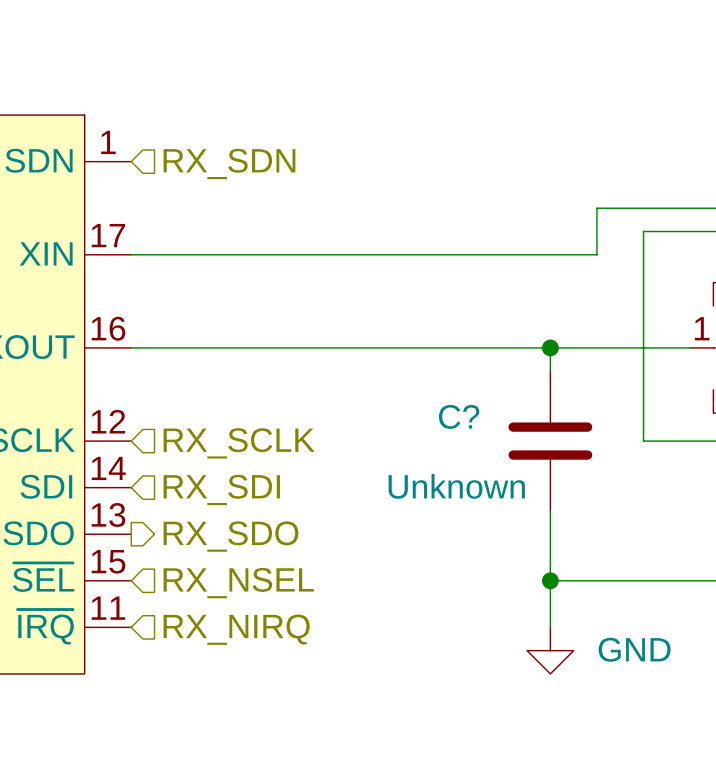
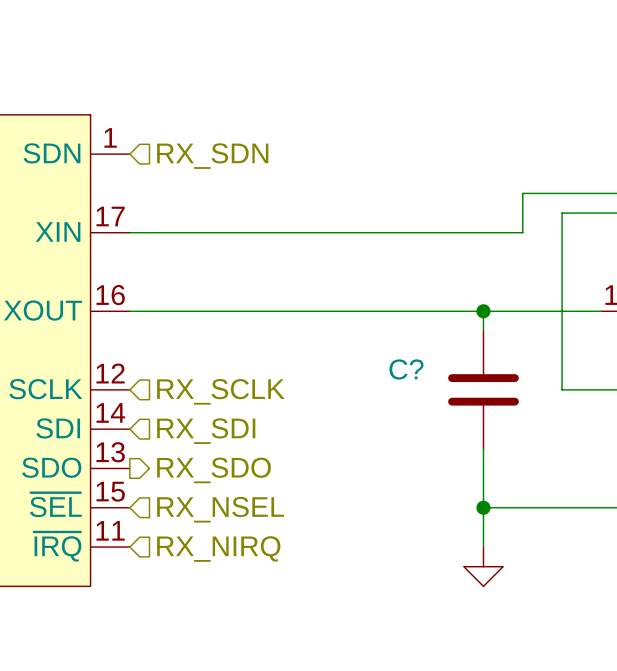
C? value: Unknown (456, 486) -> none
power symbol text: GND (634, 649) -> none

